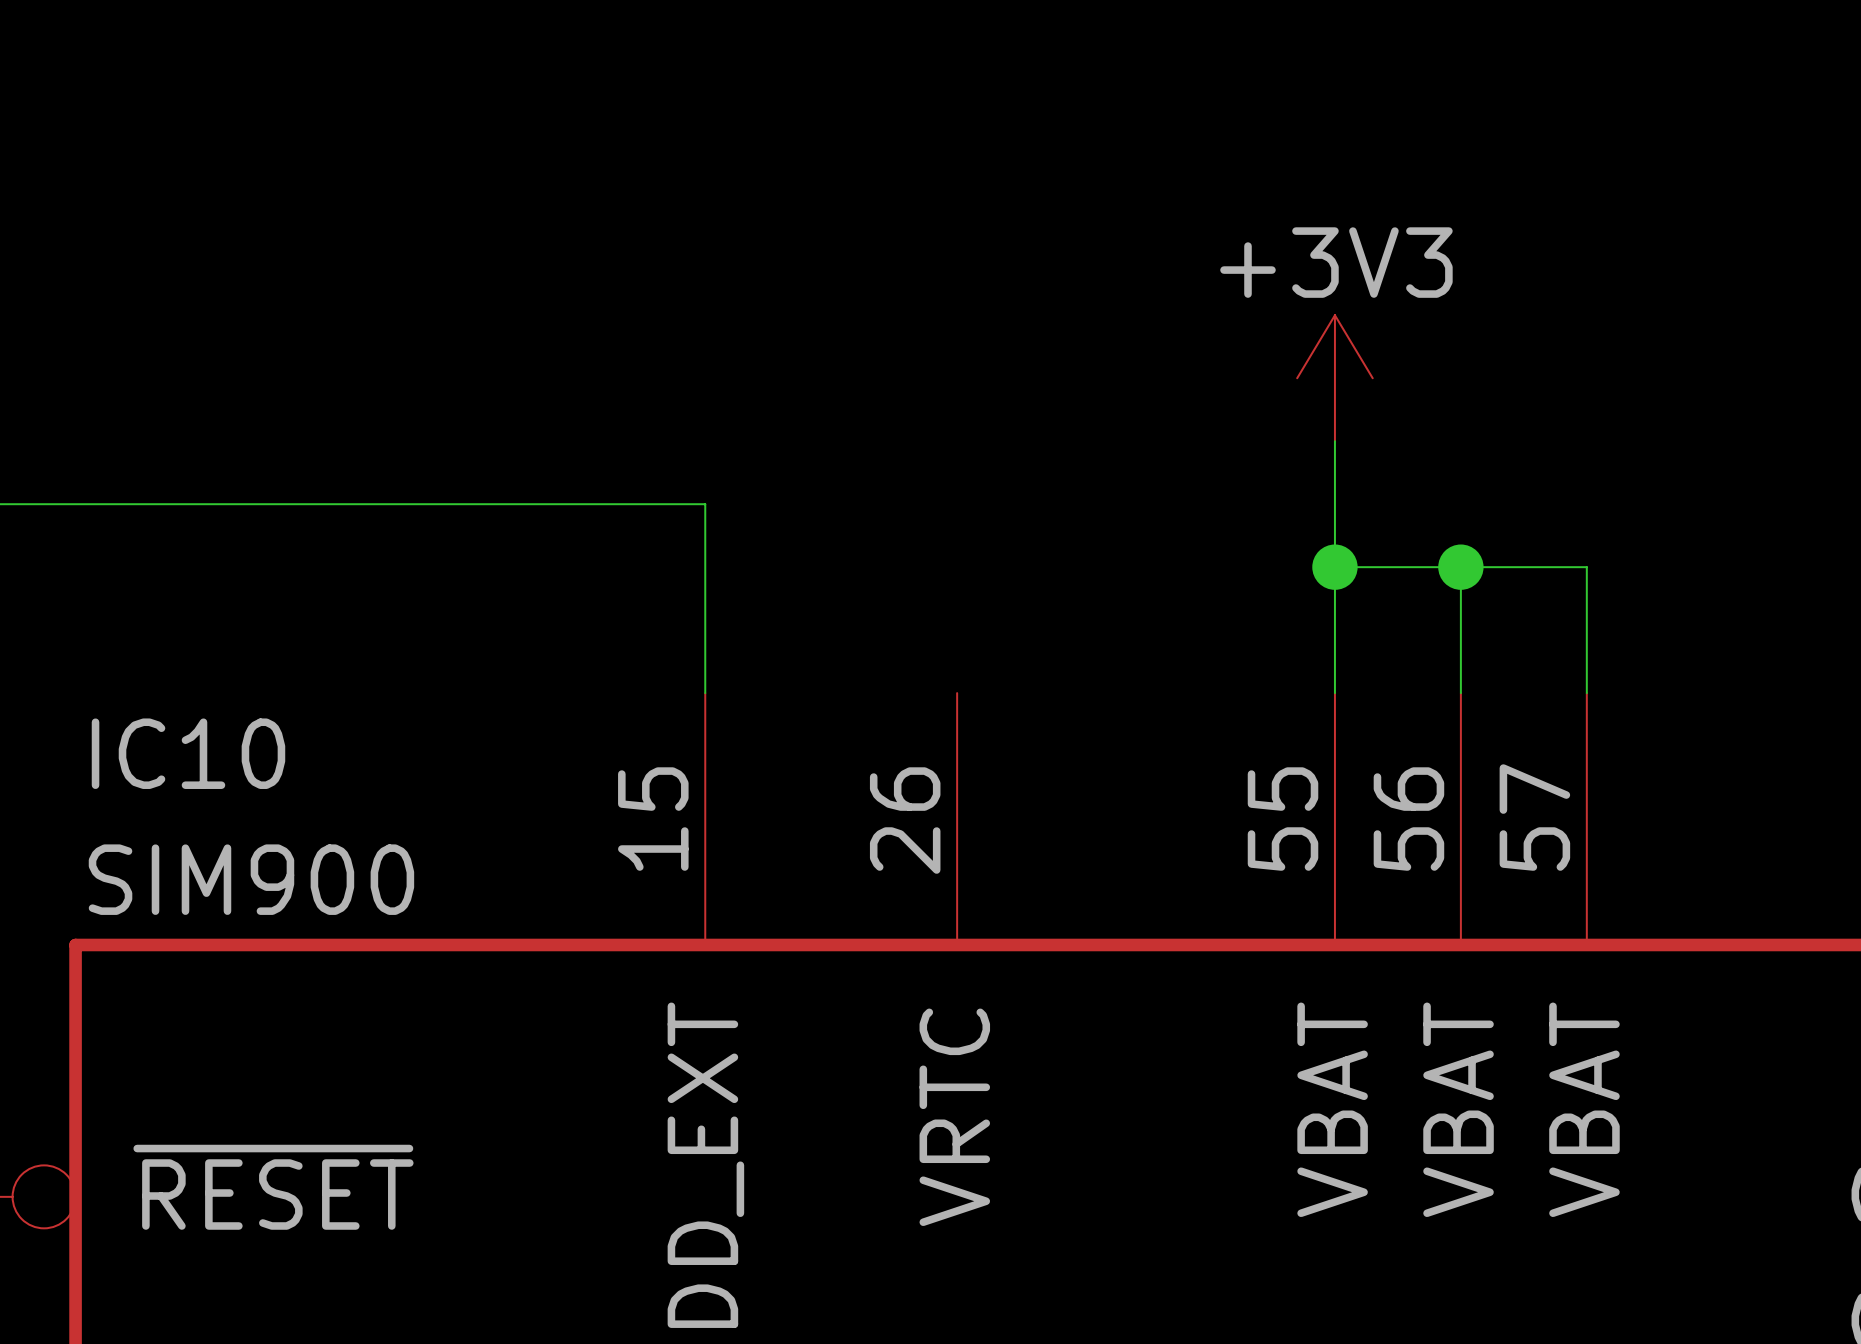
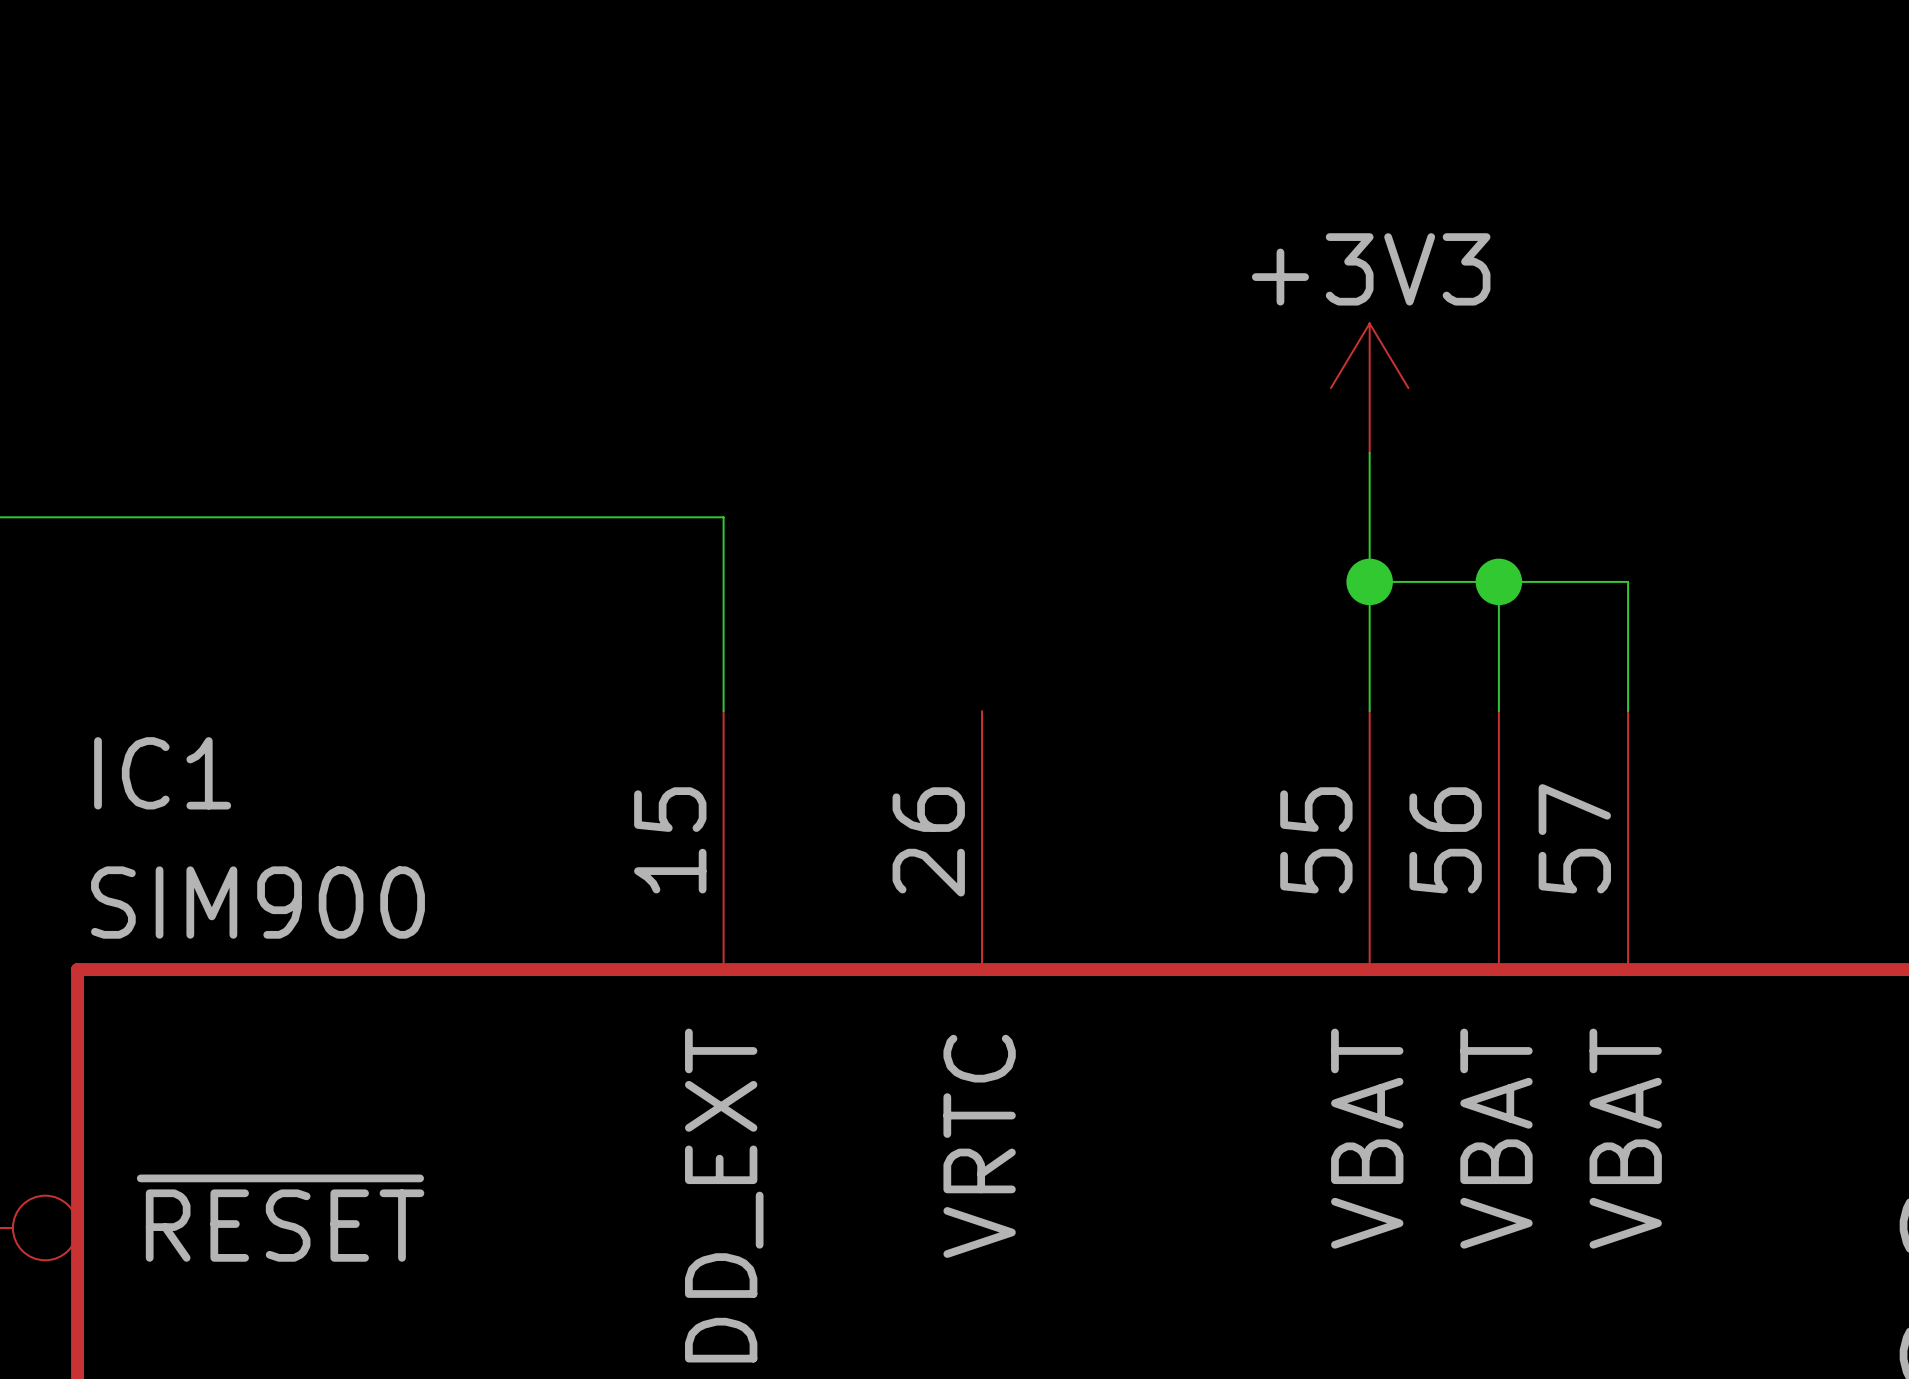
IC10 name: IC10 (188, 753) -> IC1 (162, 773)

